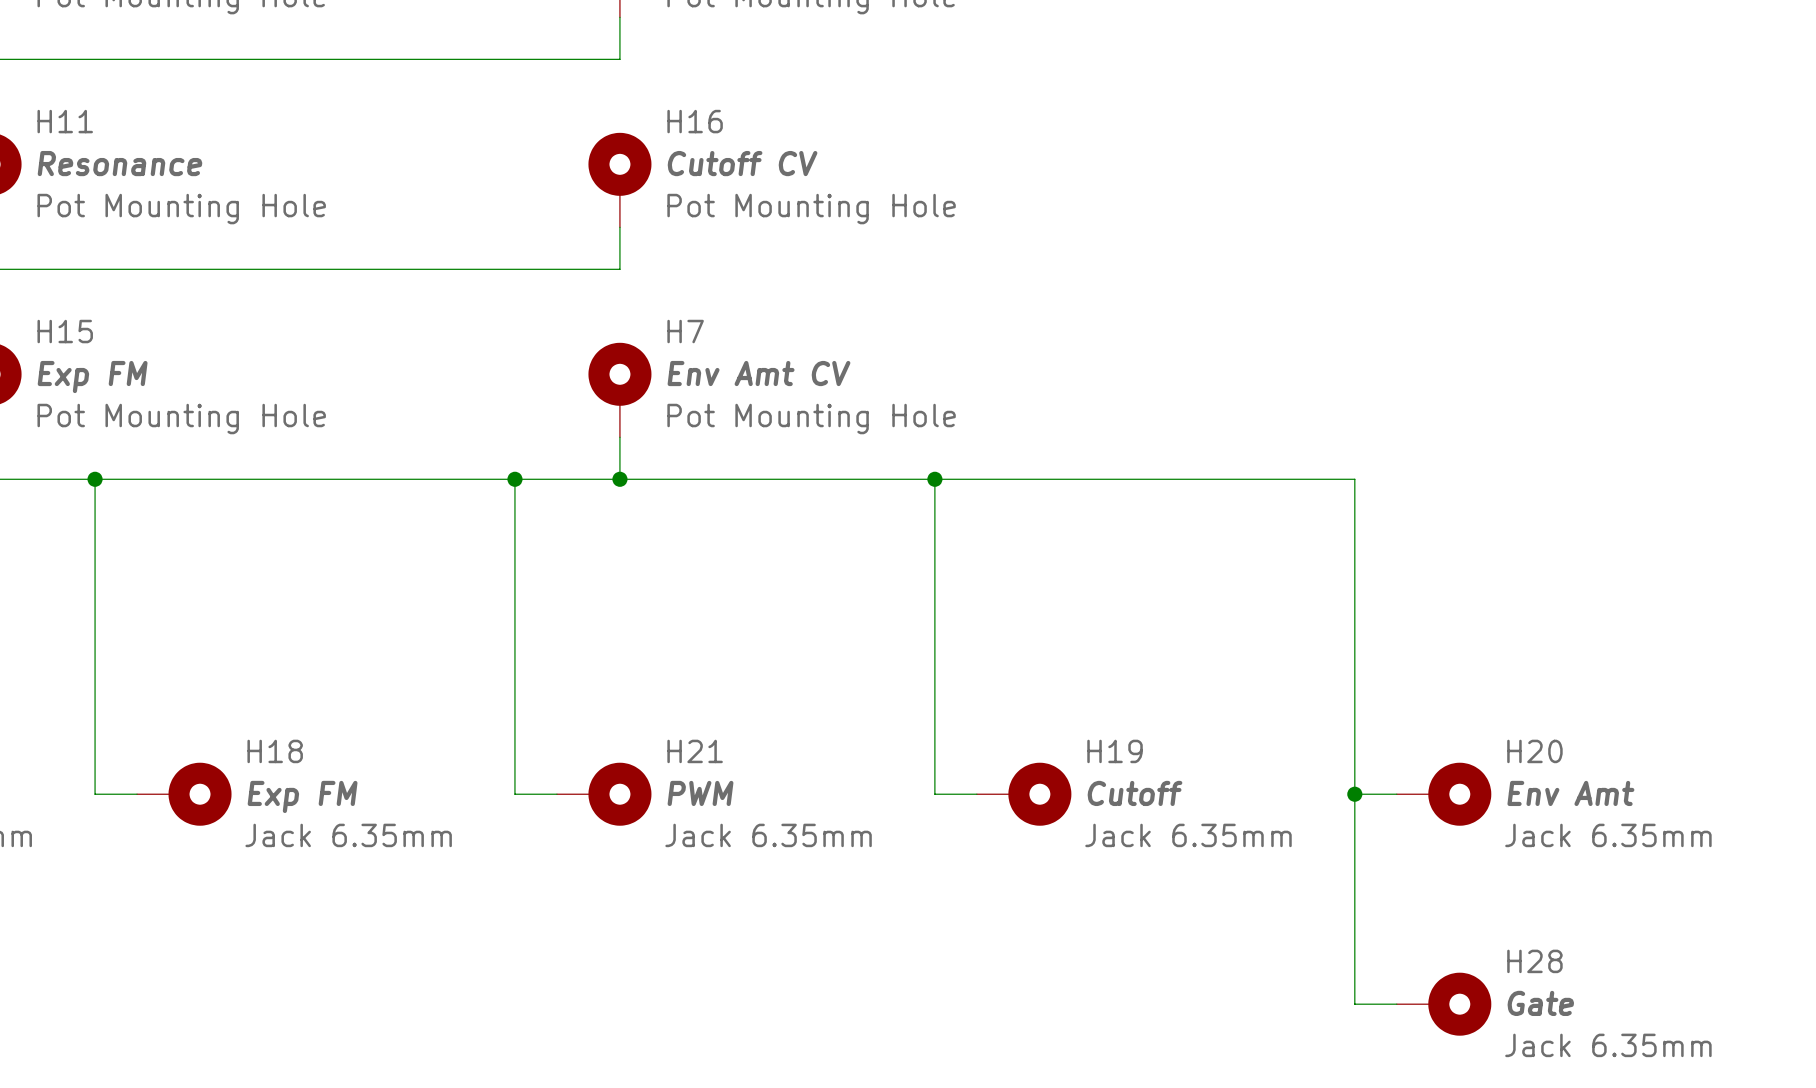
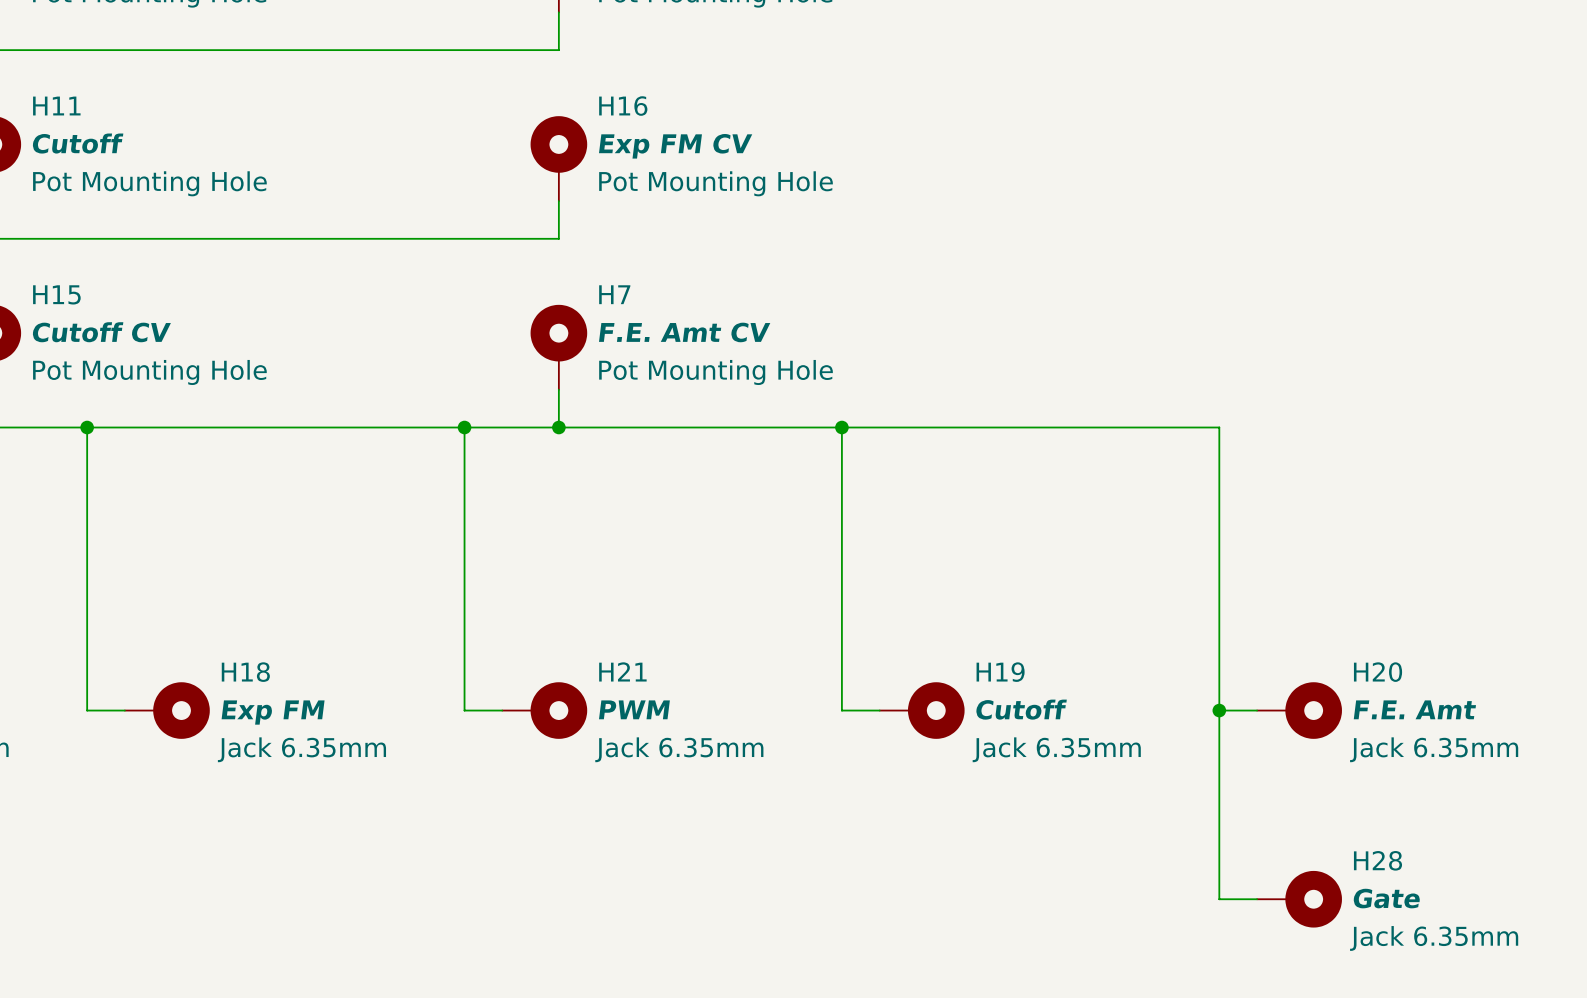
H11 value: Resonance (119, 163) -> Cutoff (77, 143)
H16 value: Cutoff CV (742, 163) -> Exp FM CV (675, 146)
H7 value: Env Amt CV (759, 373) -> F.E. Amt CV (684, 332)
H15 value: Exp FM (92, 377) -> Cutoff CV (101, 332)
H20 value: Env Amt (1570, 793) -> F.E. Amt (1414, 709)

